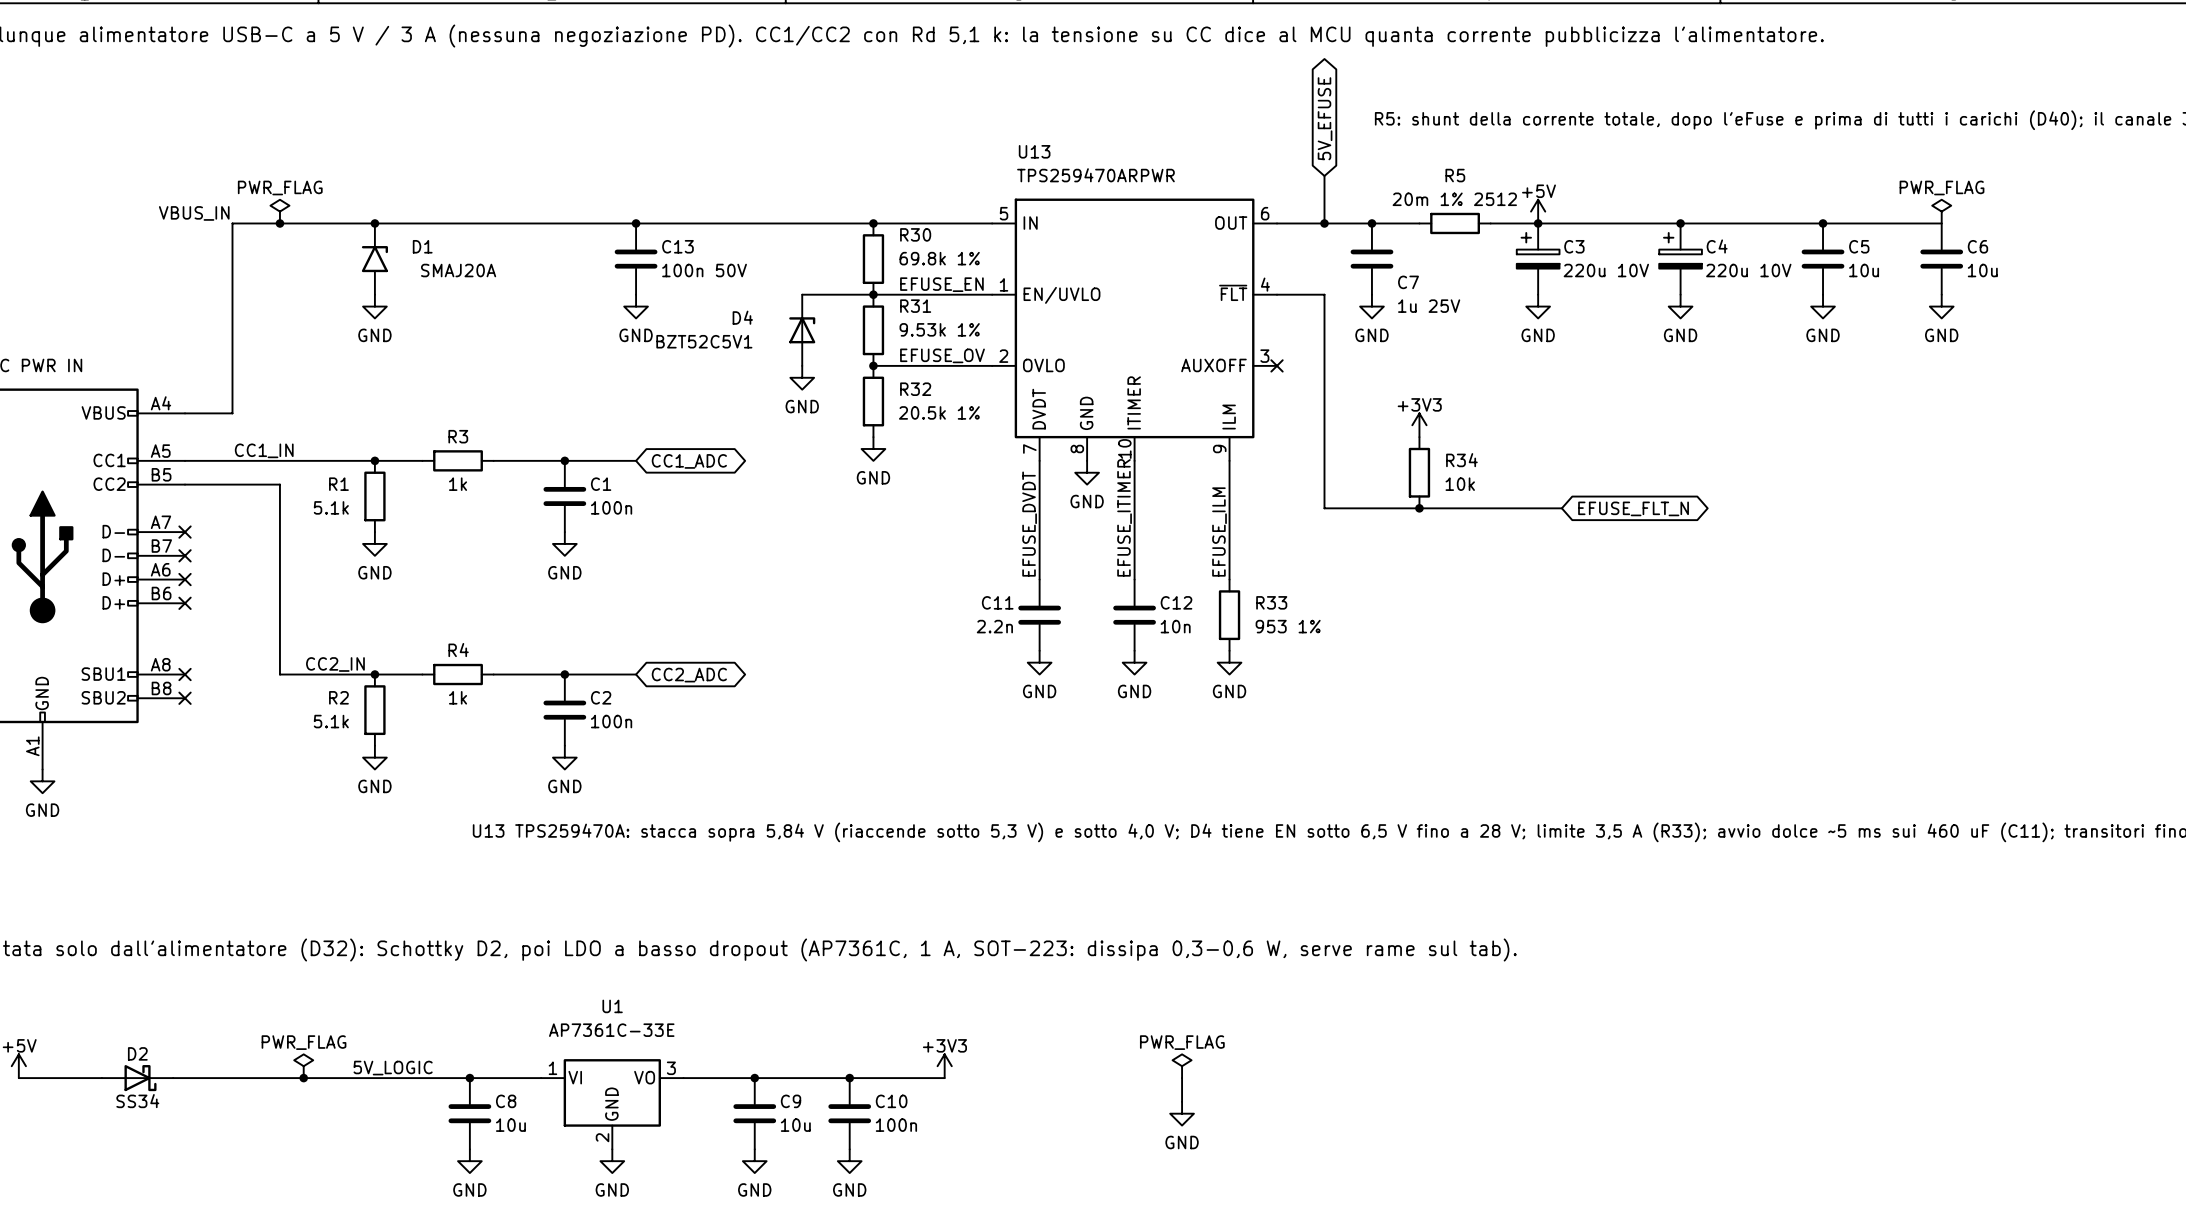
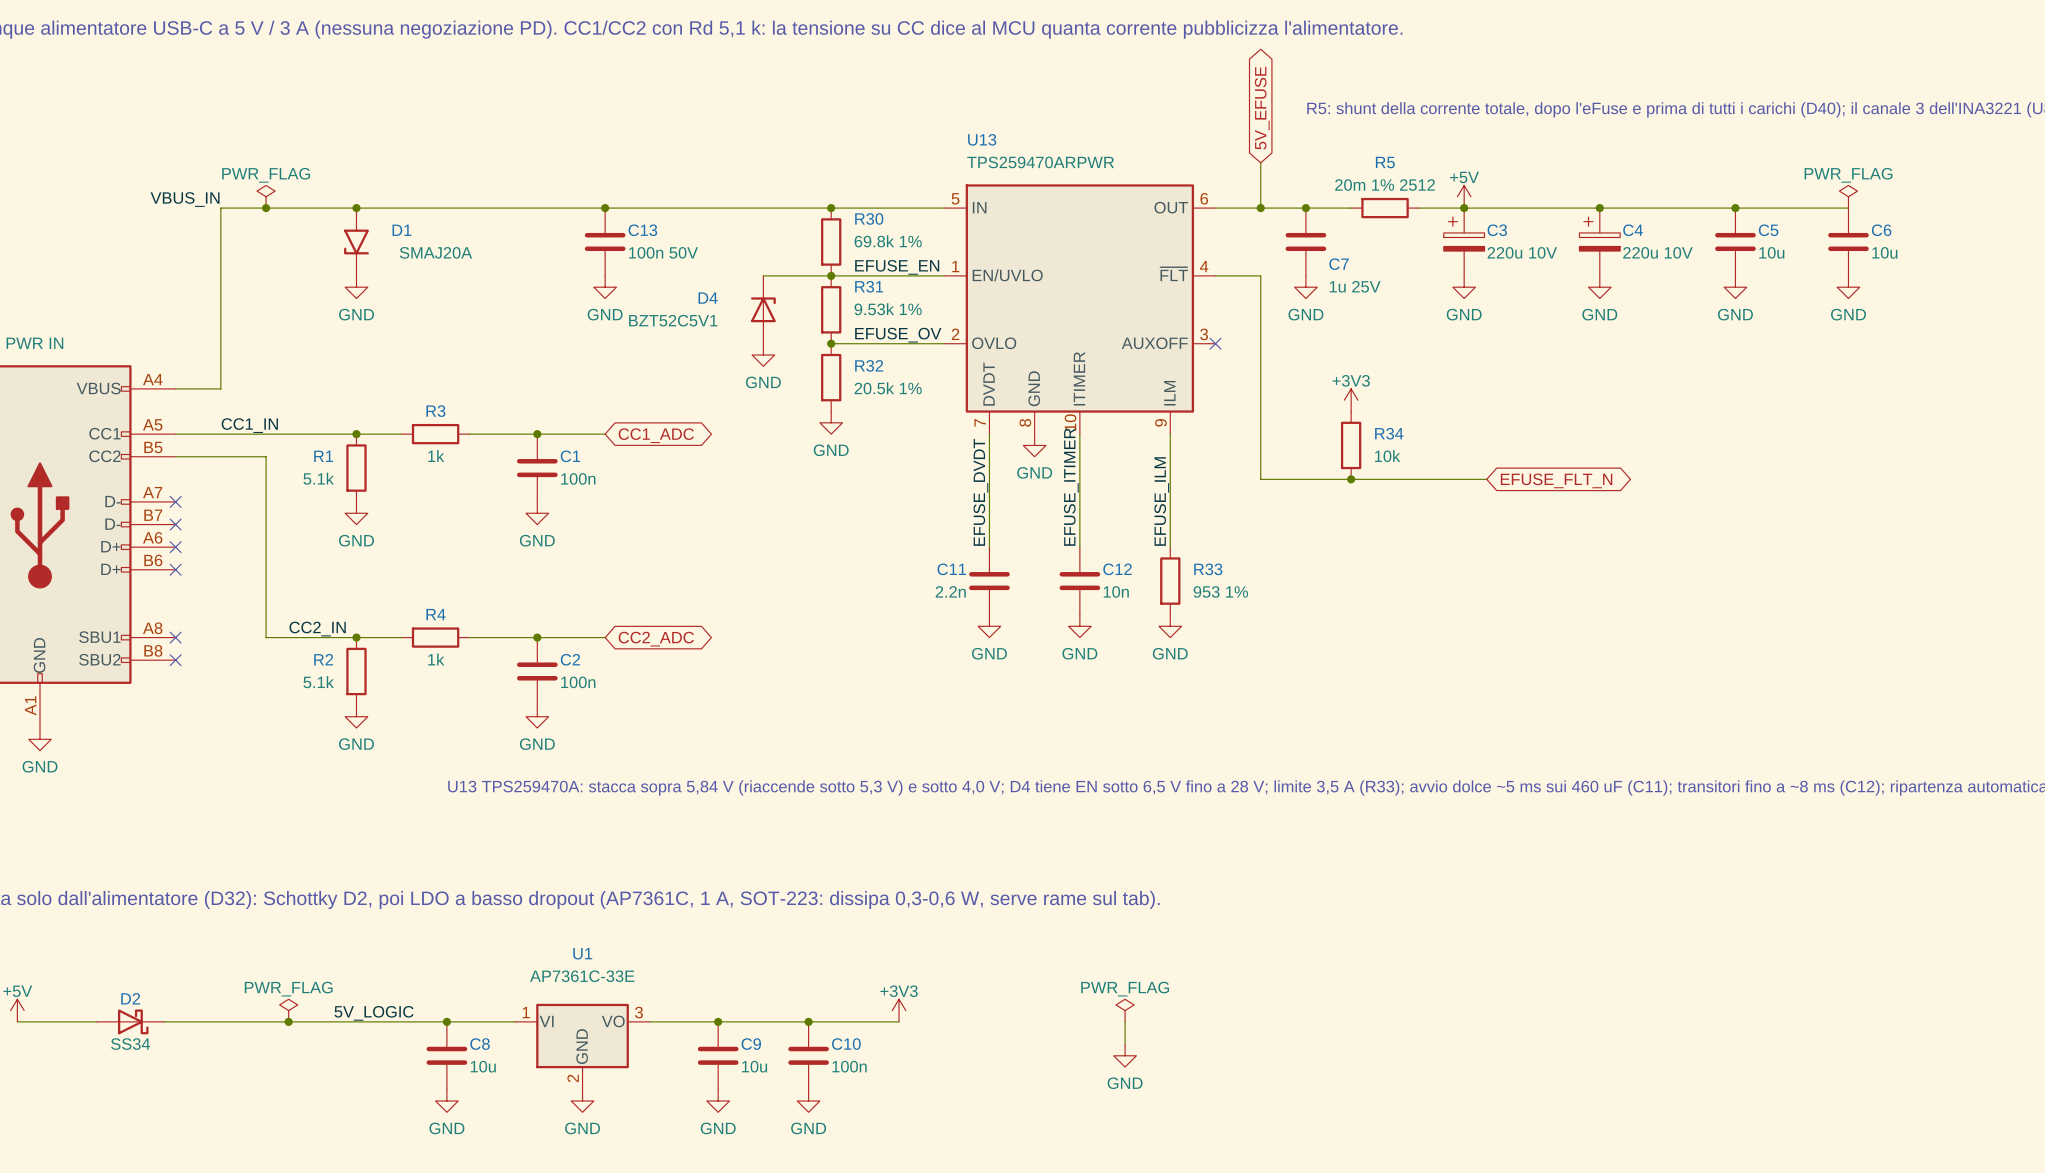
D1 rotation: 0° (374, 259) -> 180° (356, 241)

